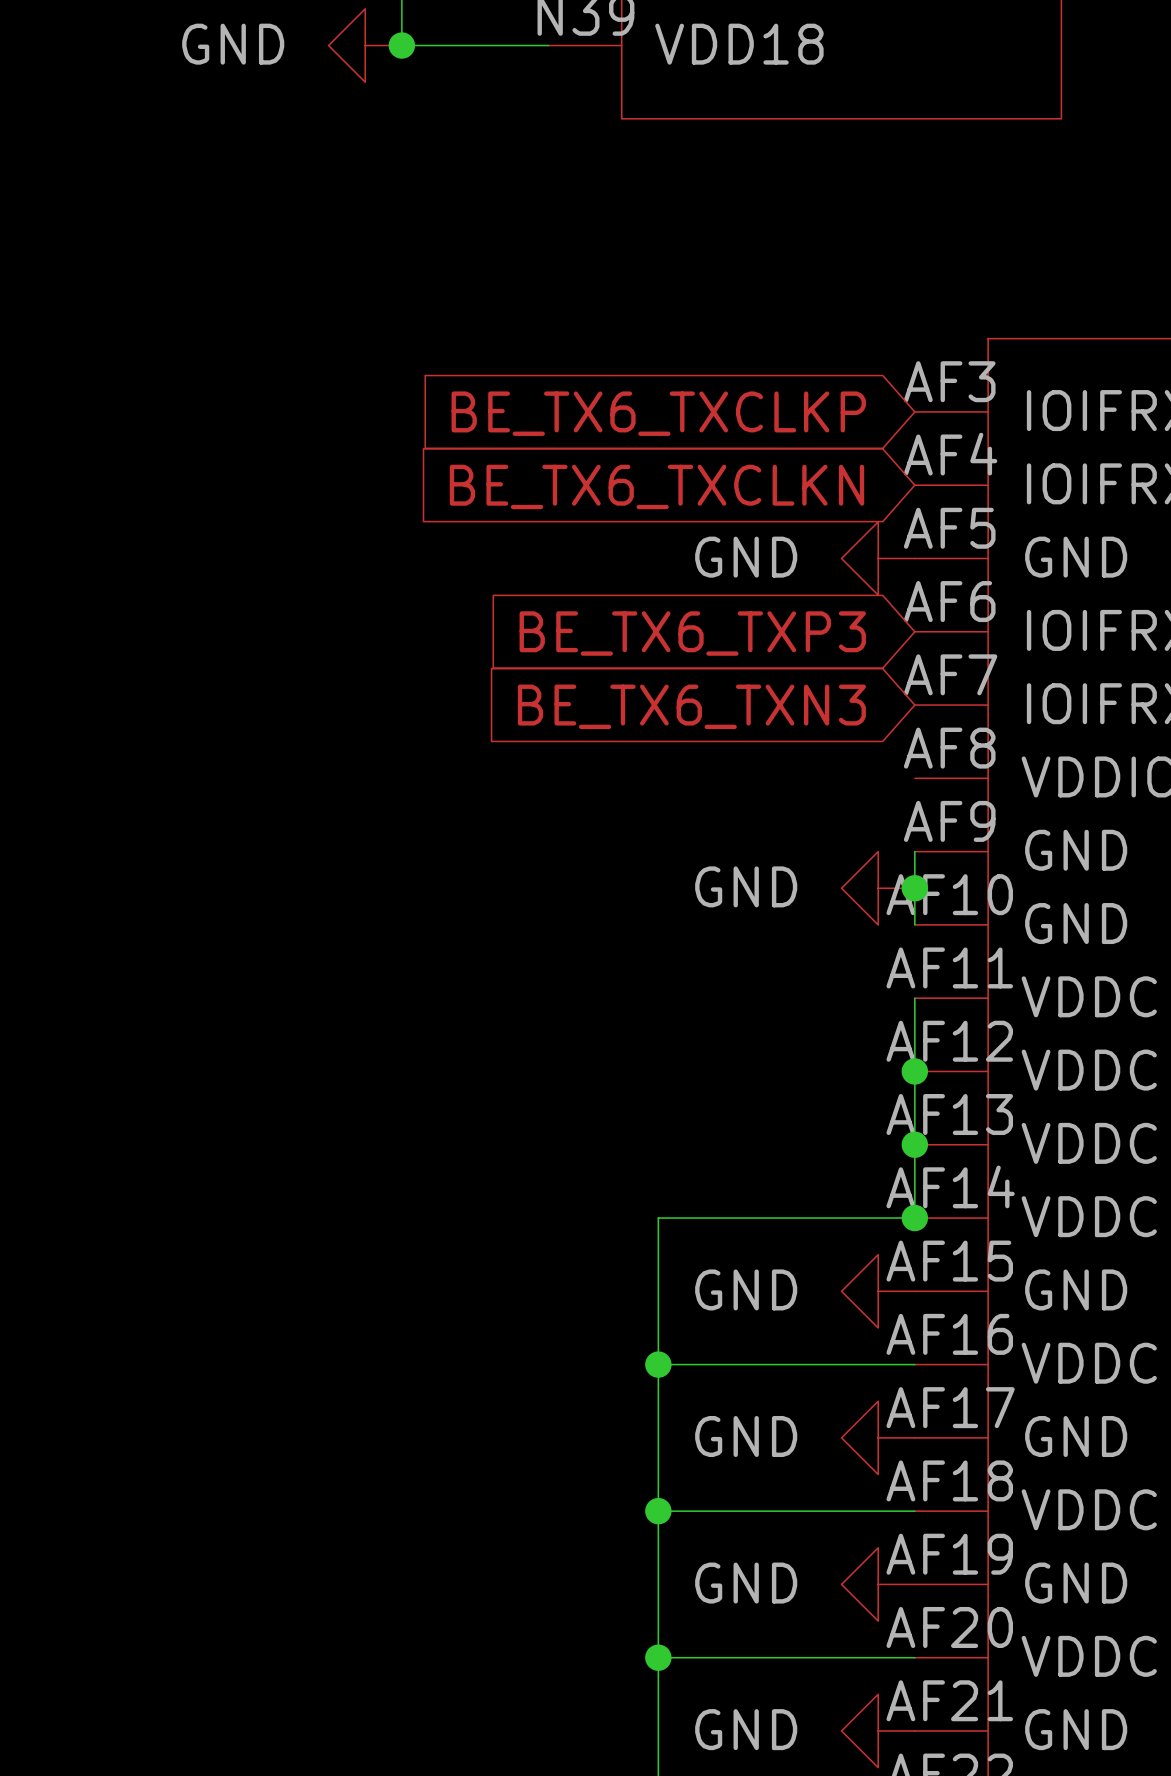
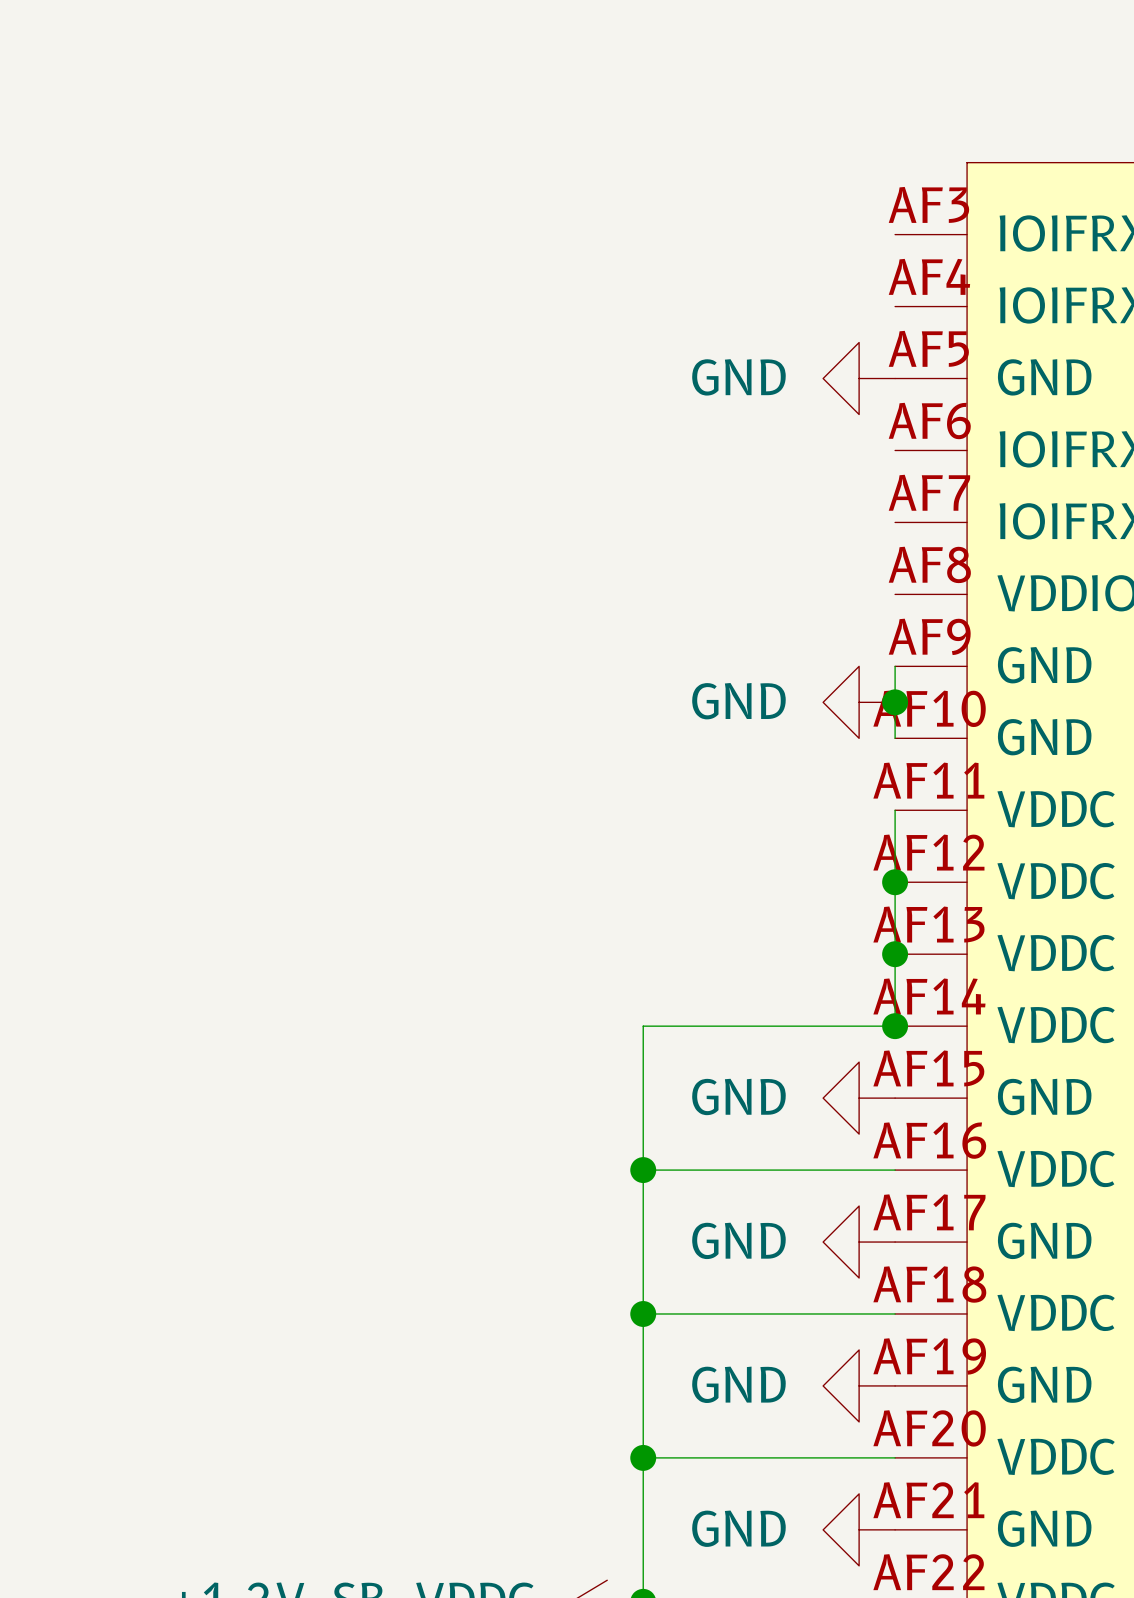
global label: BE_TX6_TXCLKP (658, 413) -> none
global label: BE_TX6_TXCLKN (656, 486) -> none
global label: BE_TX6_TXP3 (692, 633) -> none
global label: BE_TX6_TXN3 (691, 706) -> none

